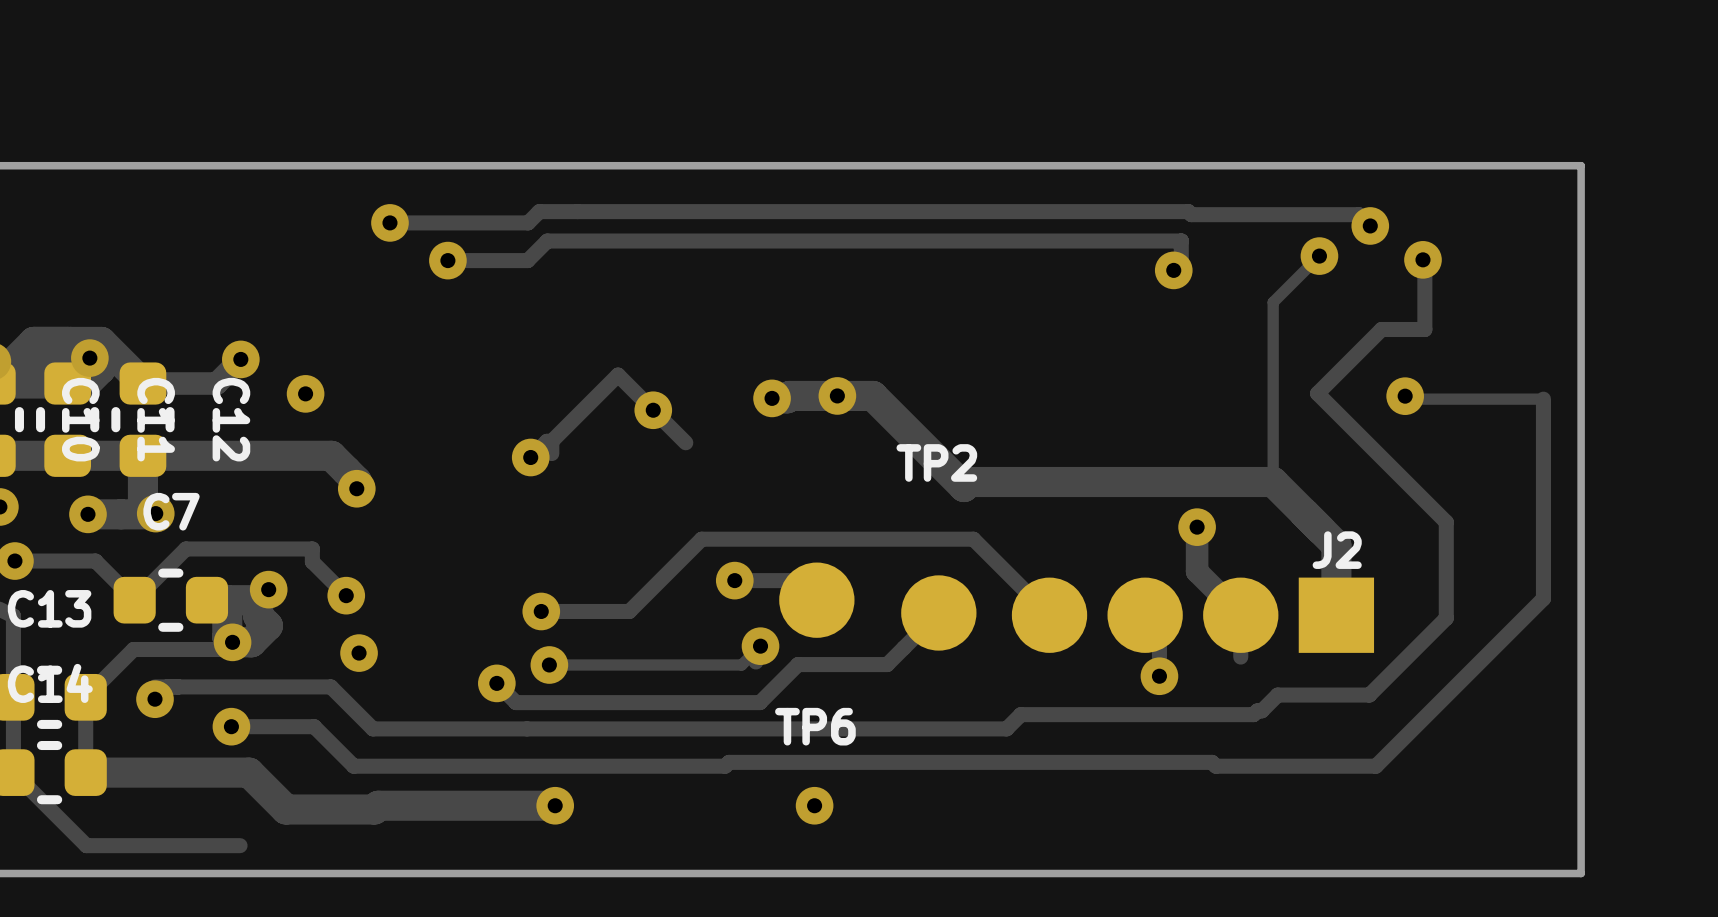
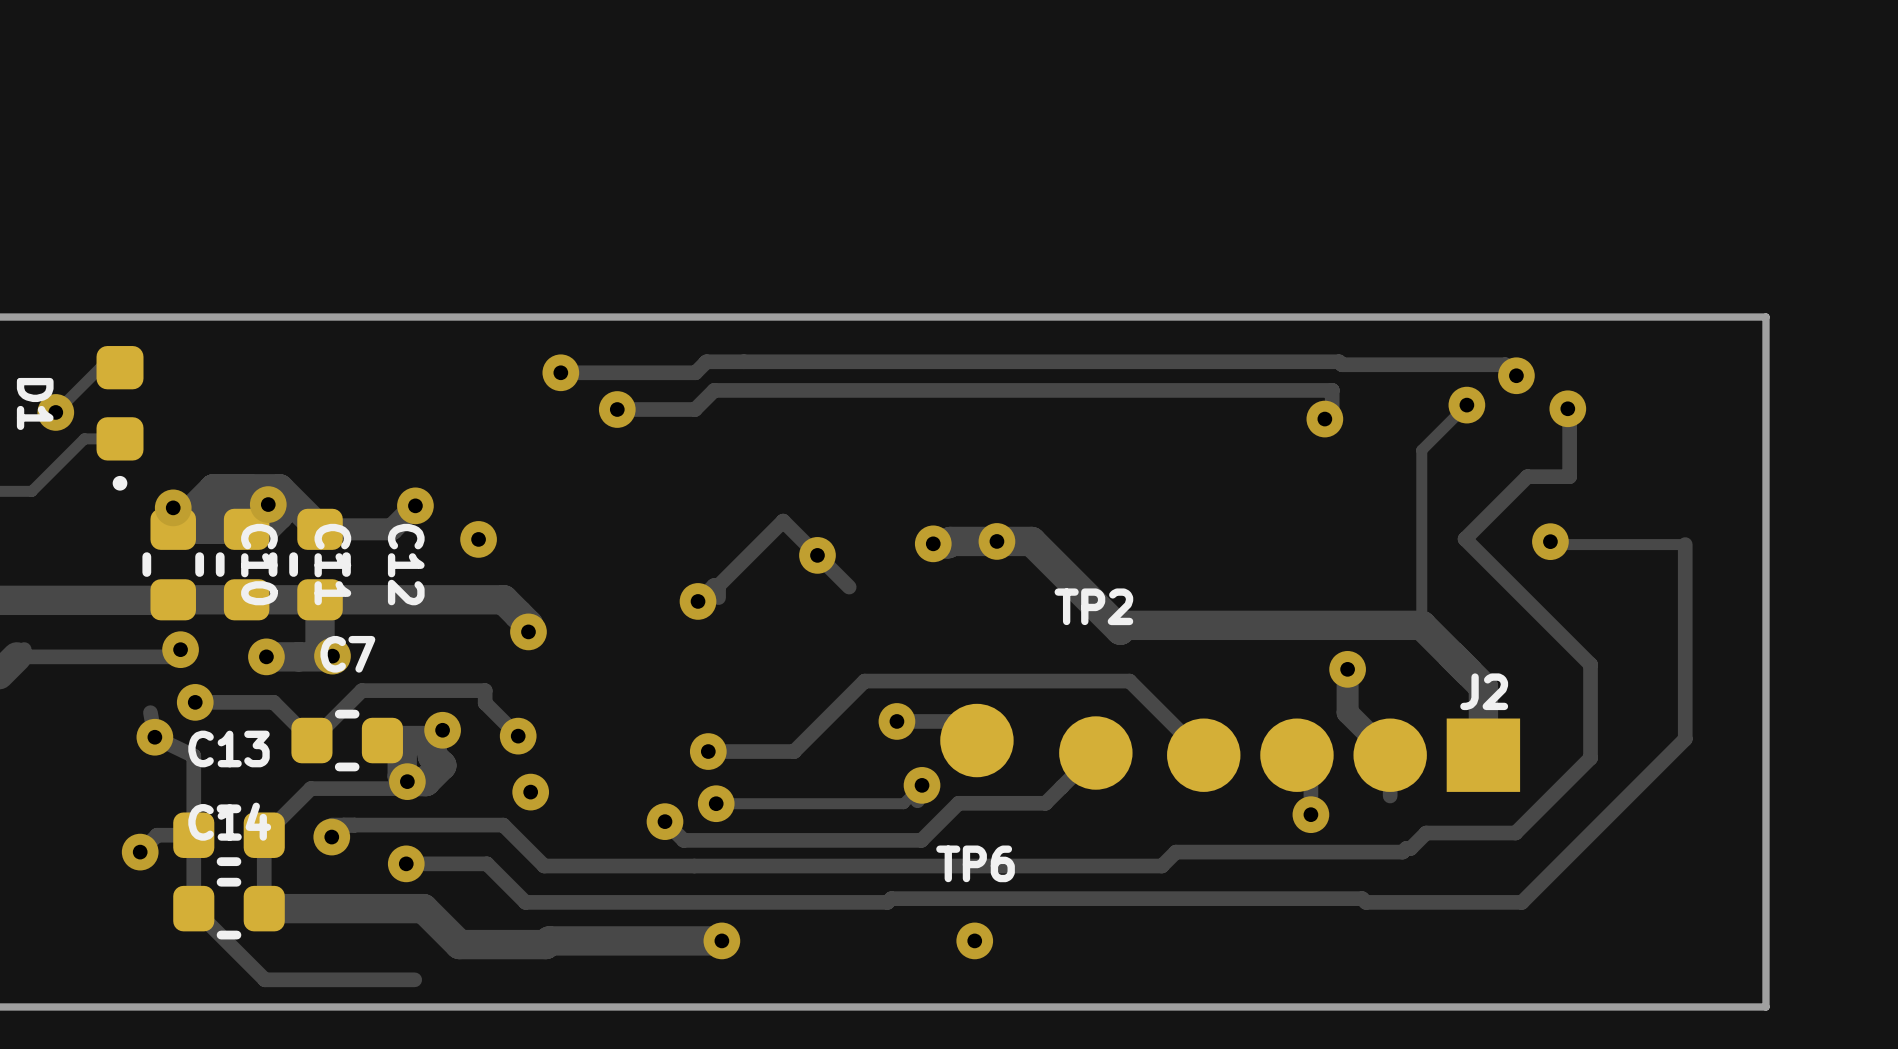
board edge: (1581, 165) (1581, 873) -> (1721, 317) (1765, 317) (1765, 1006) (1721, 1006)

